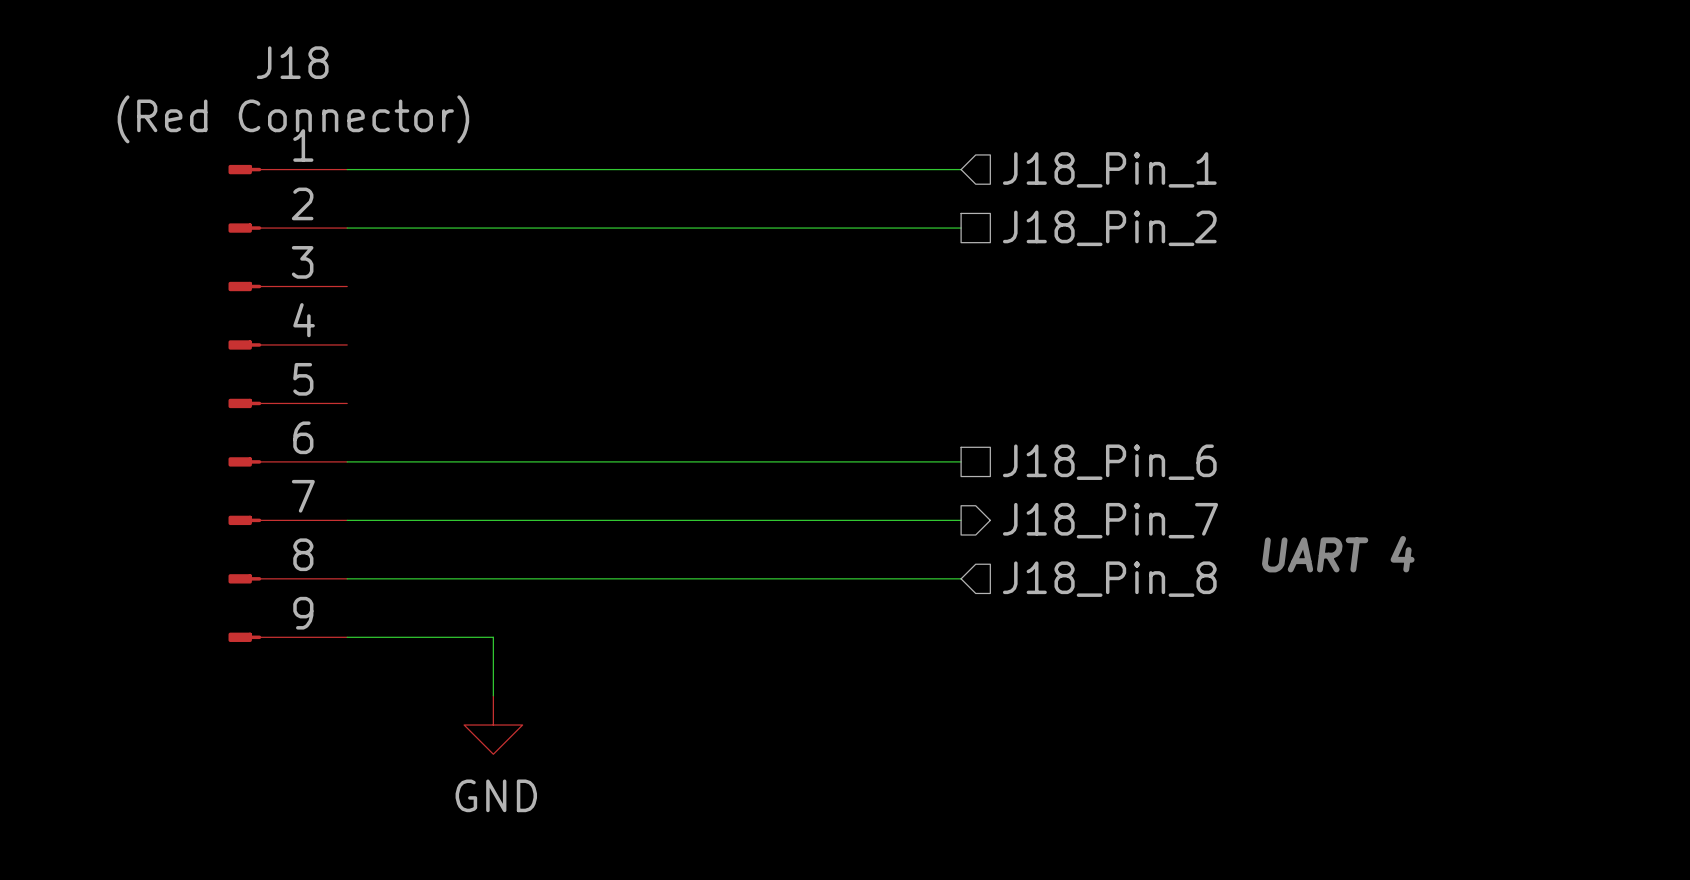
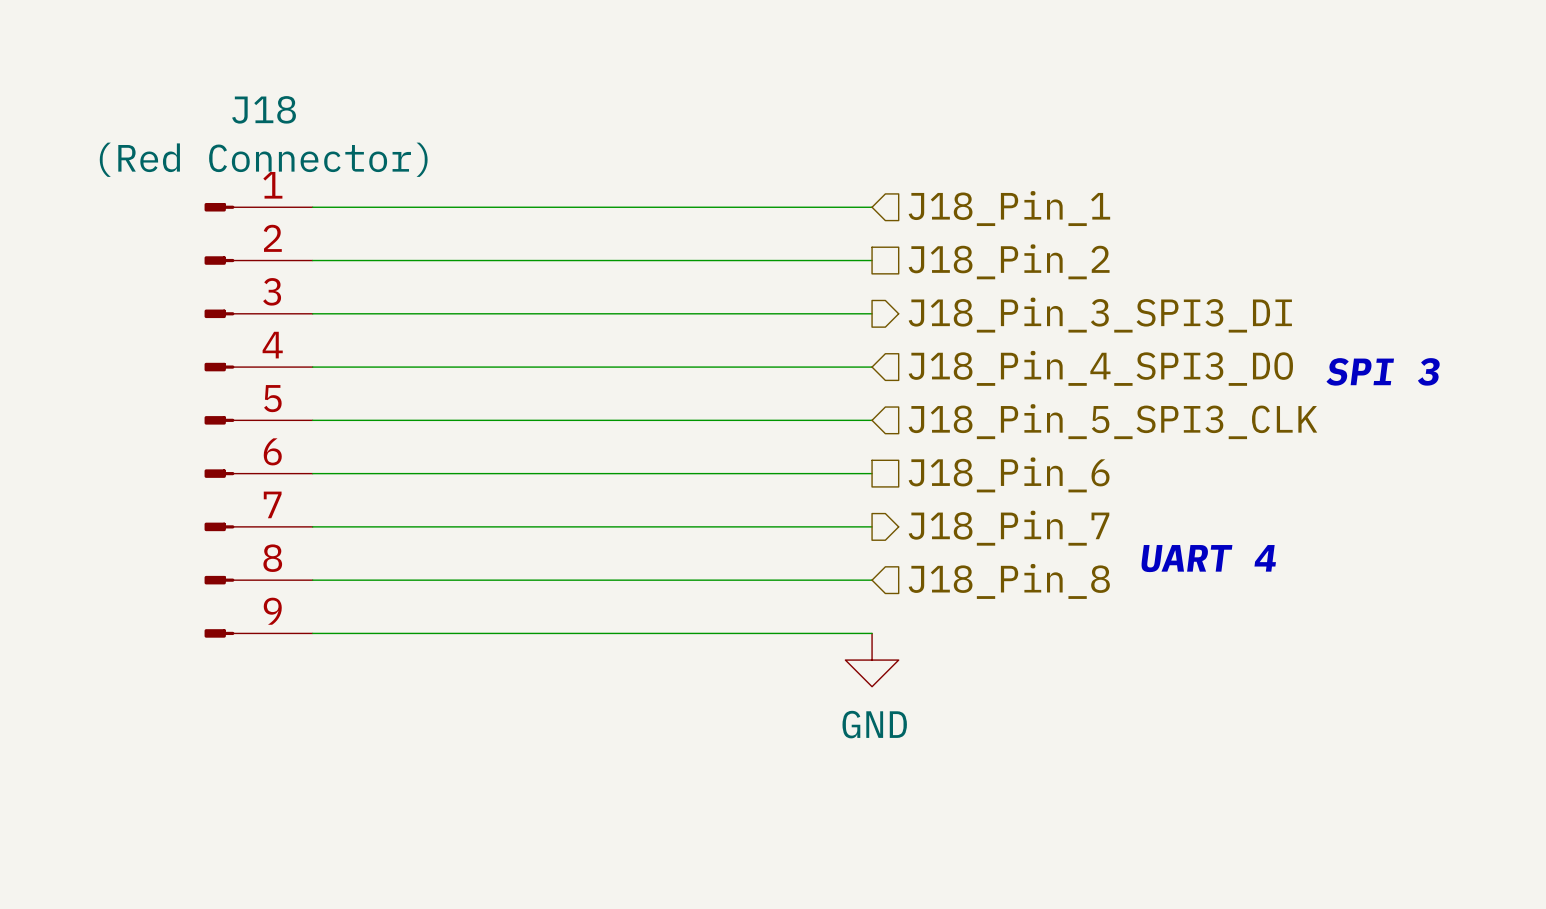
wire: none -> (312, 313) (872, 313)
hierarchical label: none -> J18_Pin_3_SPI3_DI (1100, 315)
wire: none -> (312, 367) (872, 367)
hierarchical label: none -> J18_Pin_4_SPI3_DO (1100, 368)
text: none -> SPI 3 (1383, 371)
wire: none -> (312, 420) (872, 420)
hierarchical label: none -> J18_Pin_5_SPI3_CLK (1112, 421)
wire: (493, 637) (493, 695) -> (445, 633) (872, 633)
power symbol position: GND (493, 725) -> GND (872, 660)

